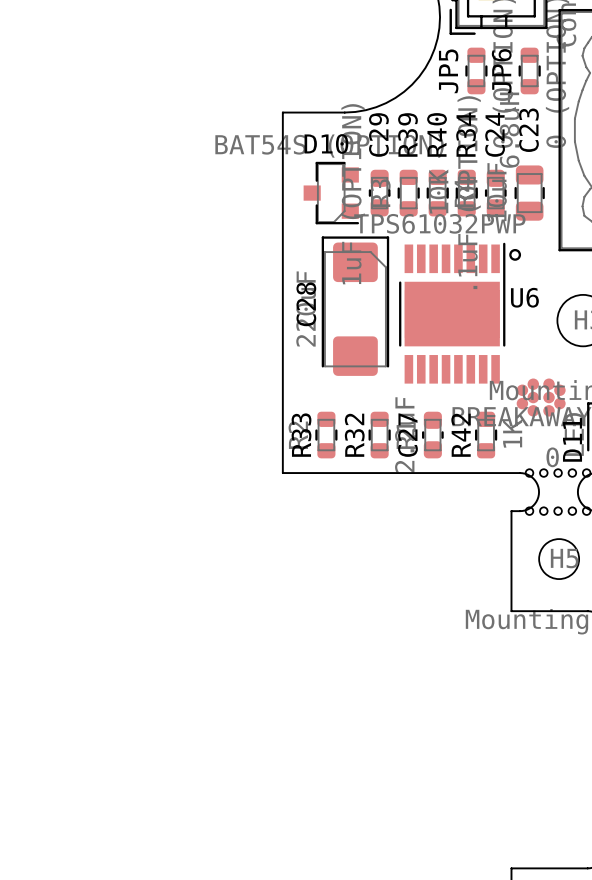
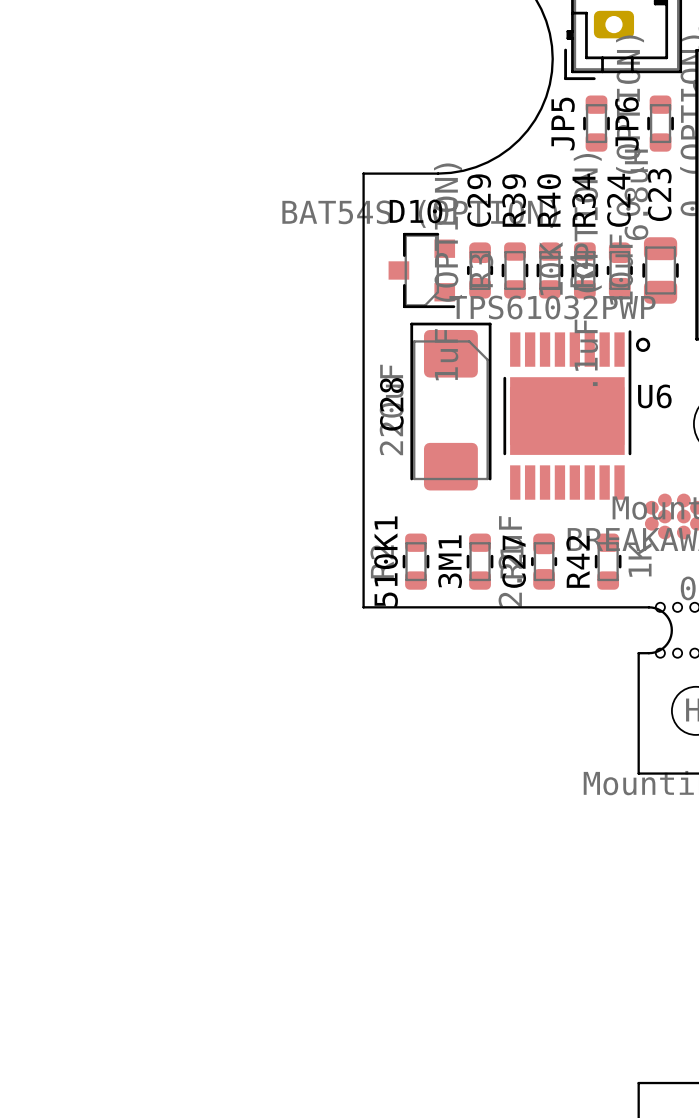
R33 name: R33 (301, 435) -> 510K1 (386, 561)
R32 name: R32 (354, 435) -> 3M1 (450, 561)

